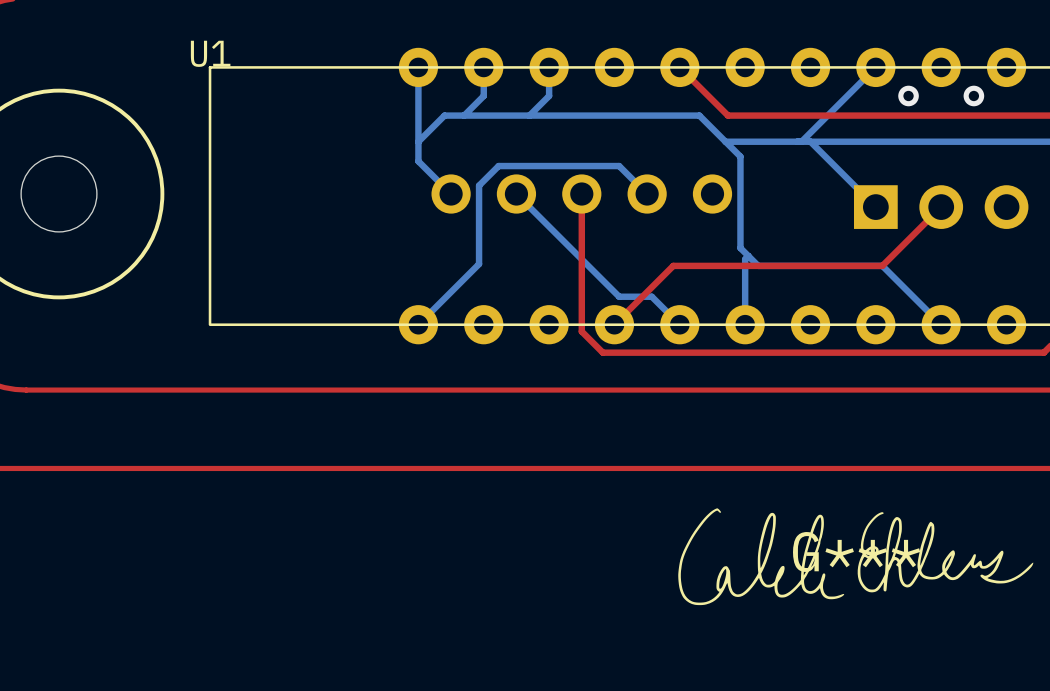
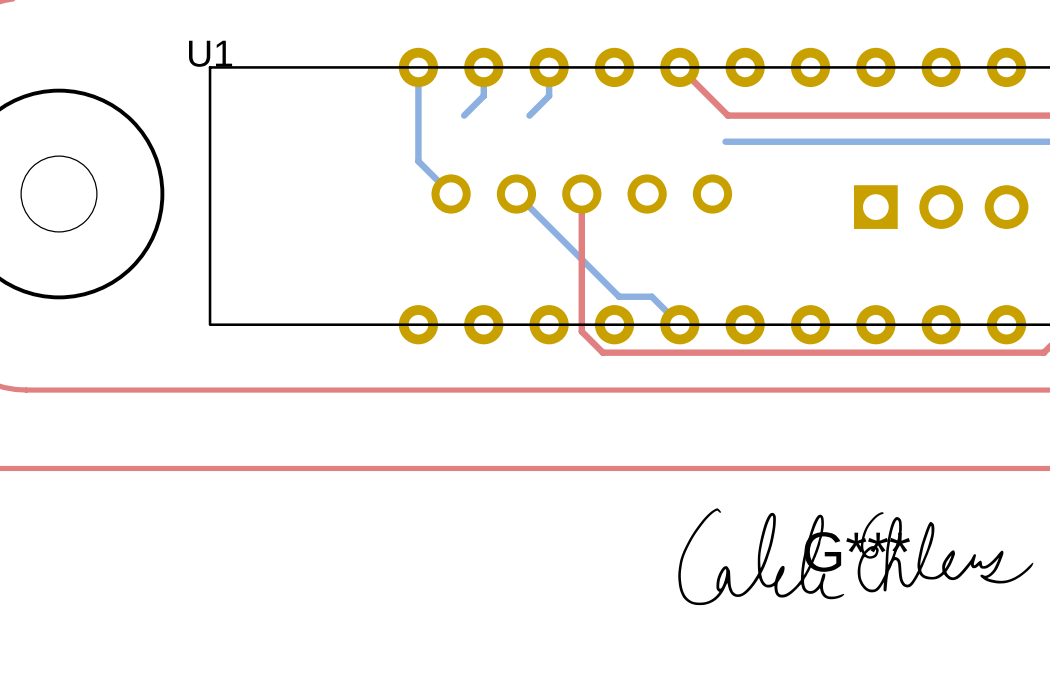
bottom track: (875, 67) (801, 141) -> none
via: (908, 95) -> none
via: (973, 95) -> none
bottom track: (418, 141) (444, 115) (699, 115) (740, 156) (740, 248) (758, 265) (882, 265) (941, 324) -> none
bottom track: (810, 141) (875, 207) -> none
bottom track: (647, 194) (619, 166) (498, 166) (479, 185) (479, 264) (418, 324) -> none
top track: (941, 207) (882, 265) (673, 265) (614, 324) -> none
bottom track: (748, 256) (745, 259) (745, 324) -> none

